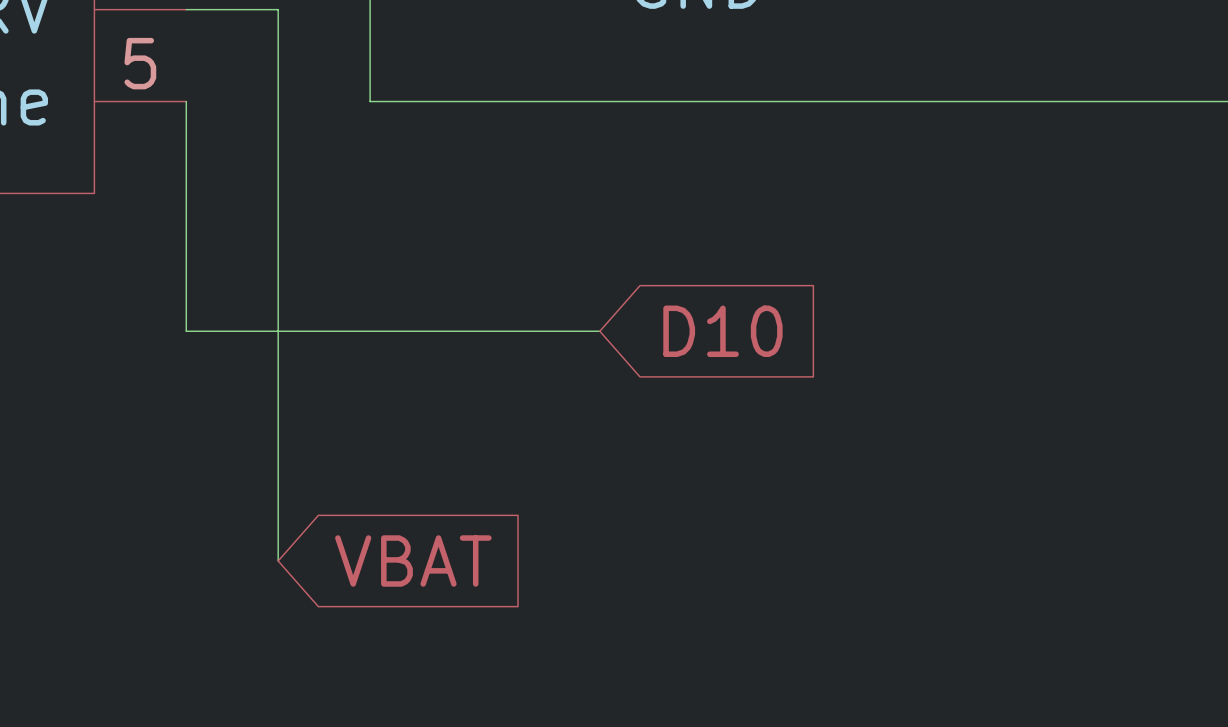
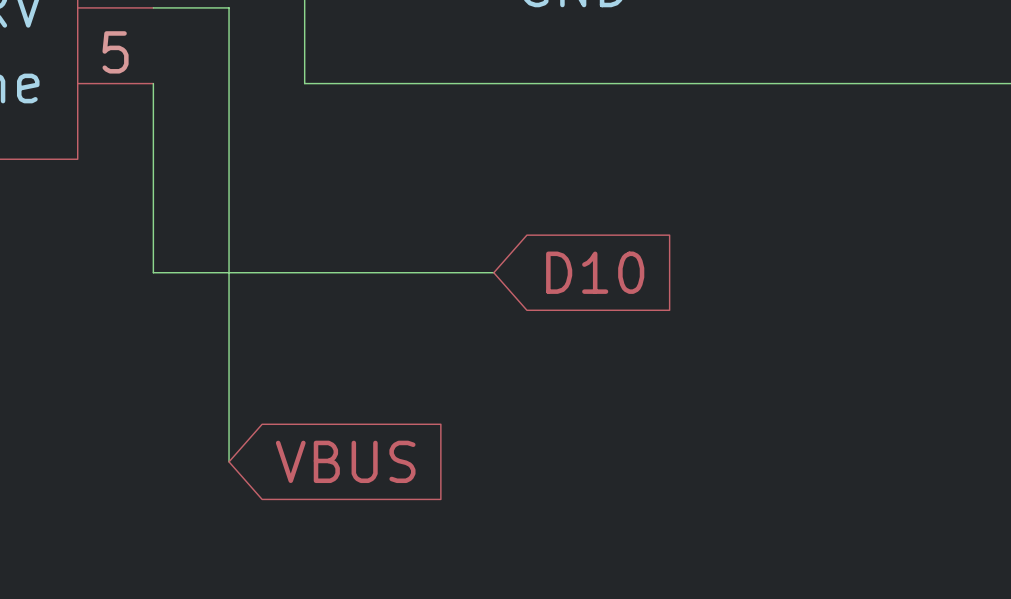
global label: VBAT (413, 561) -> VBUS (345, 461)

